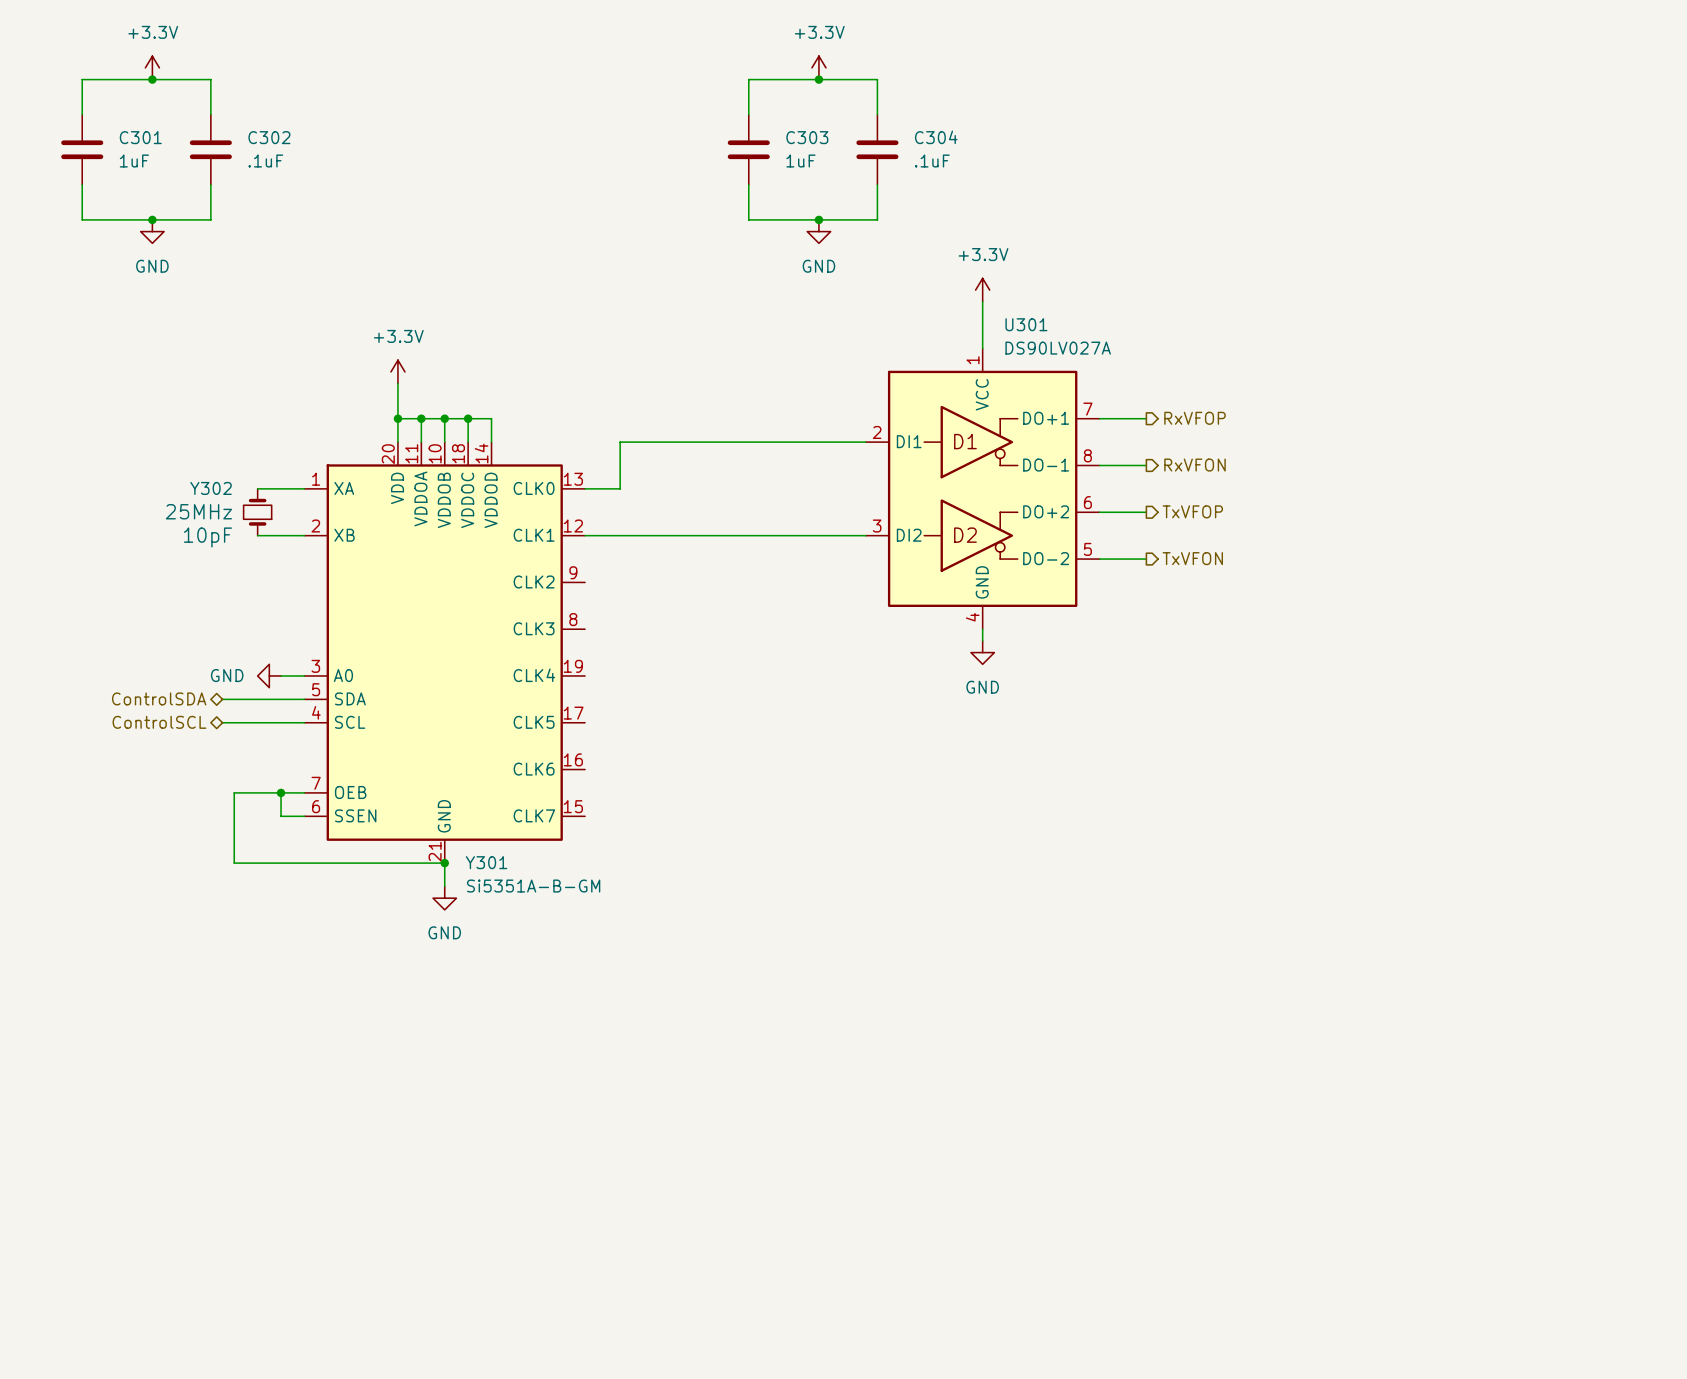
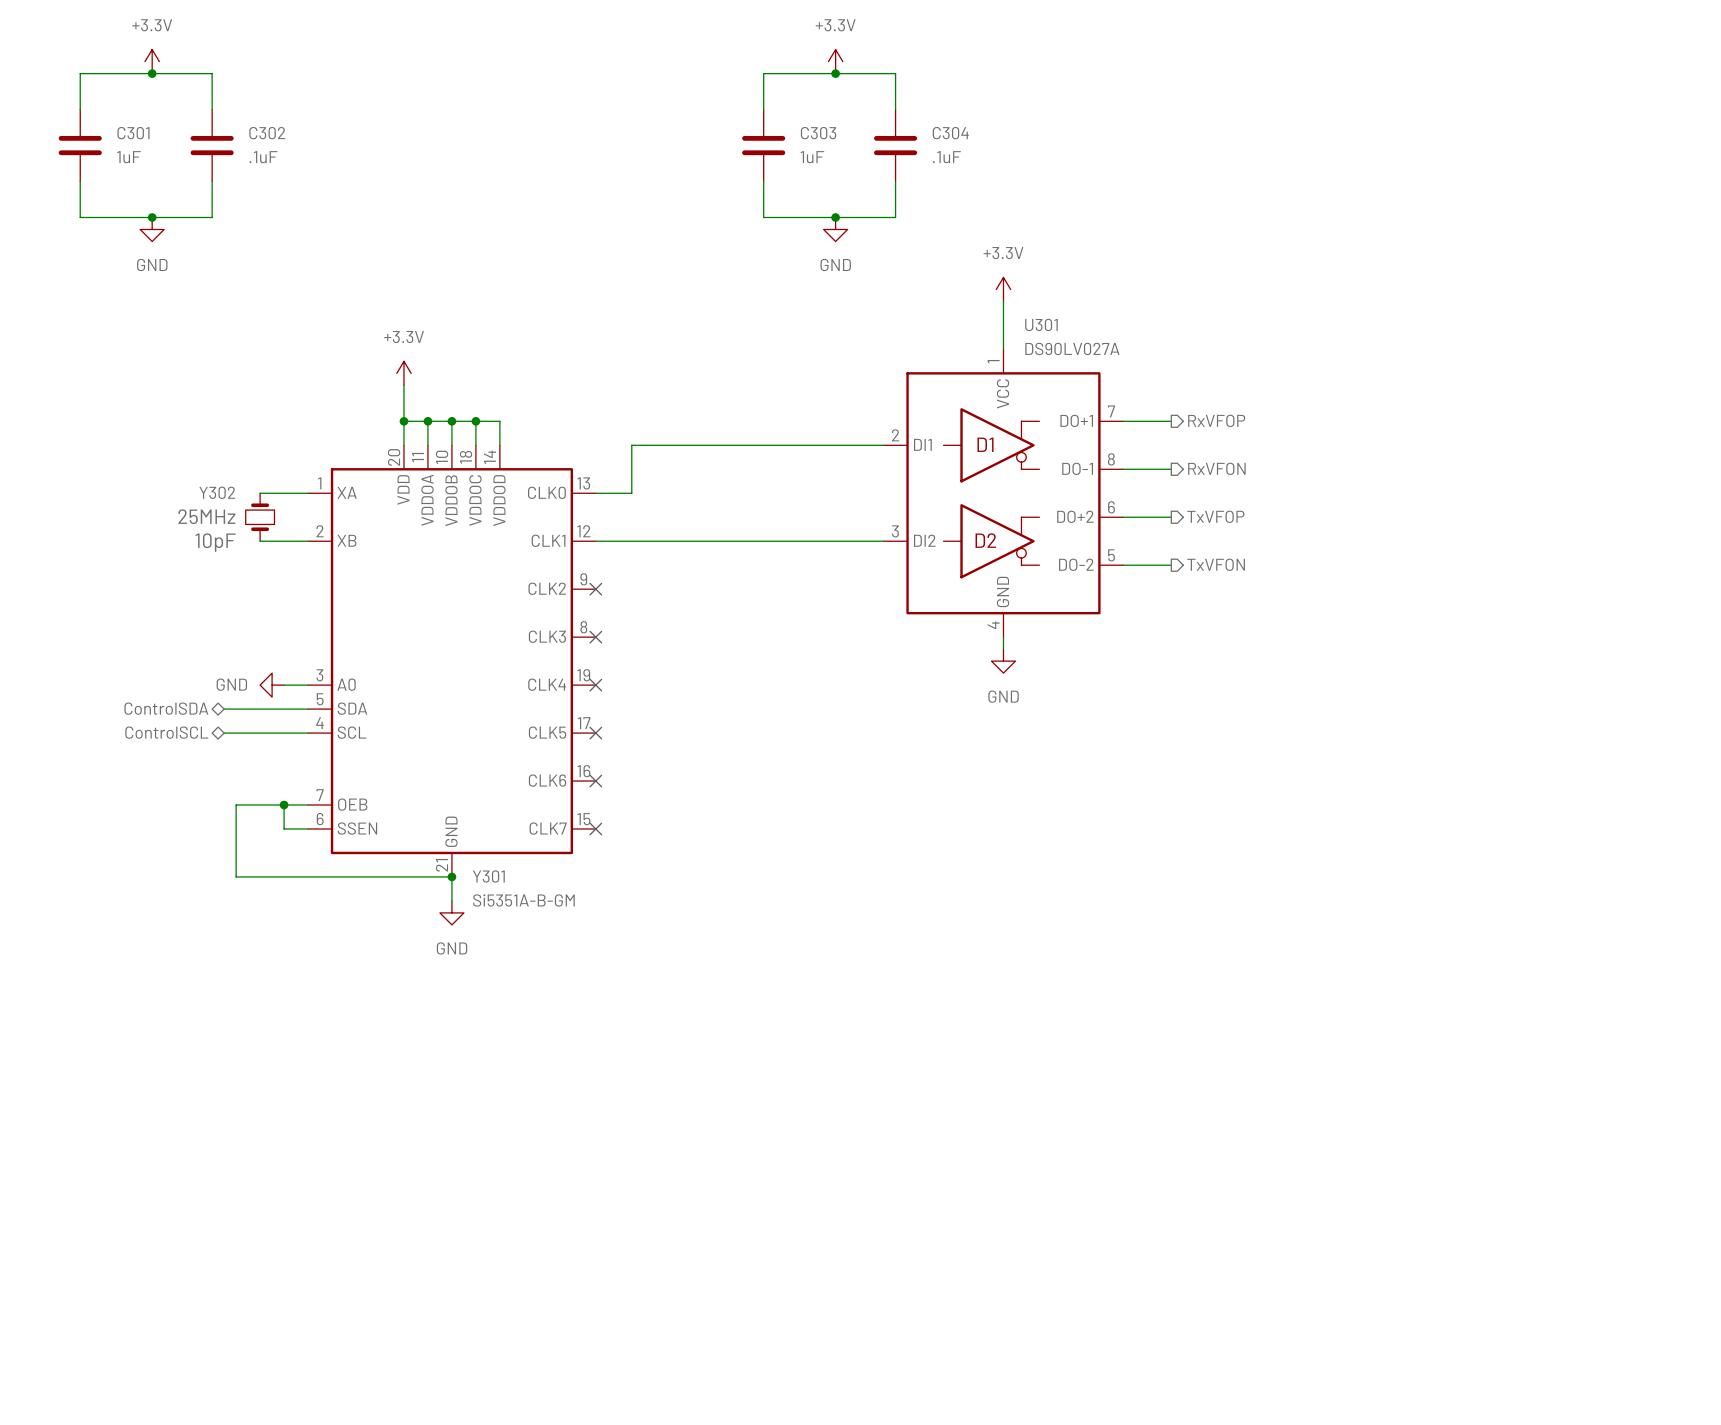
no-connect mark: none -> (595, 589)
no-connect mark: none -> (595, 637)
no-connect mark: none -> (595, 685)
no-connect mark: none -> (595, 733)
no-connect mark: none -> (595, 781)
no-connect mark: none -> (595, 828)

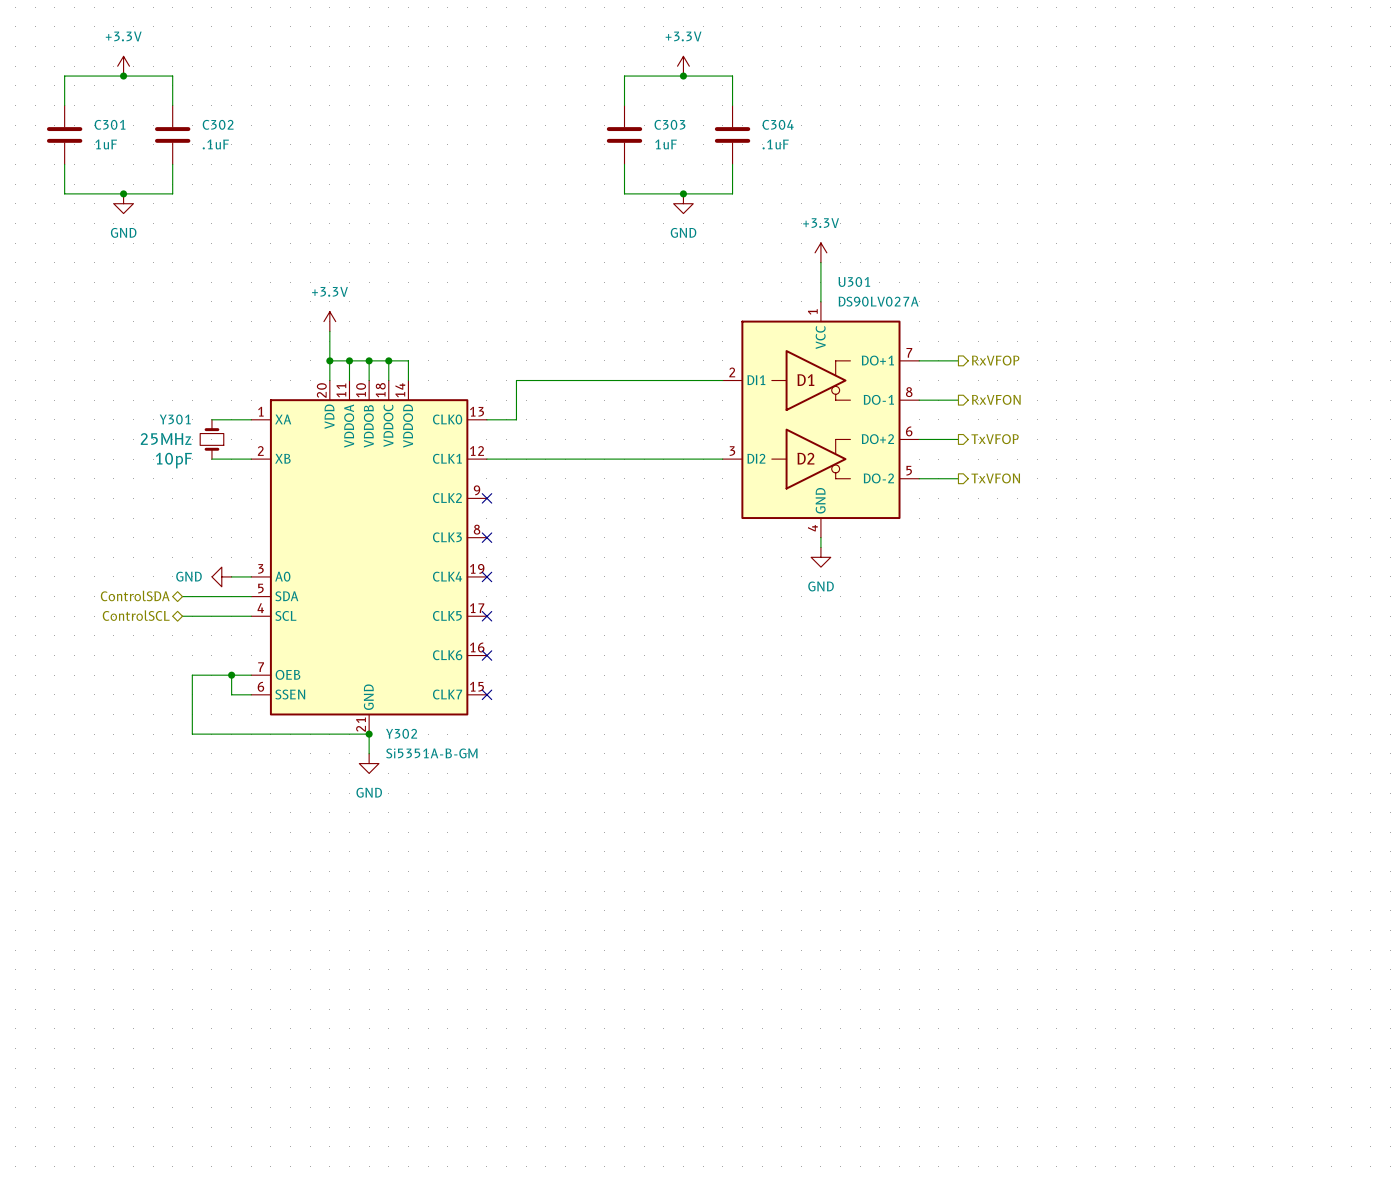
Y302 name: Y302 (217, 492) -> Y301 (175, 419)
Y301 name: Y301 (488, 876) -> Y302 (401, 733)

